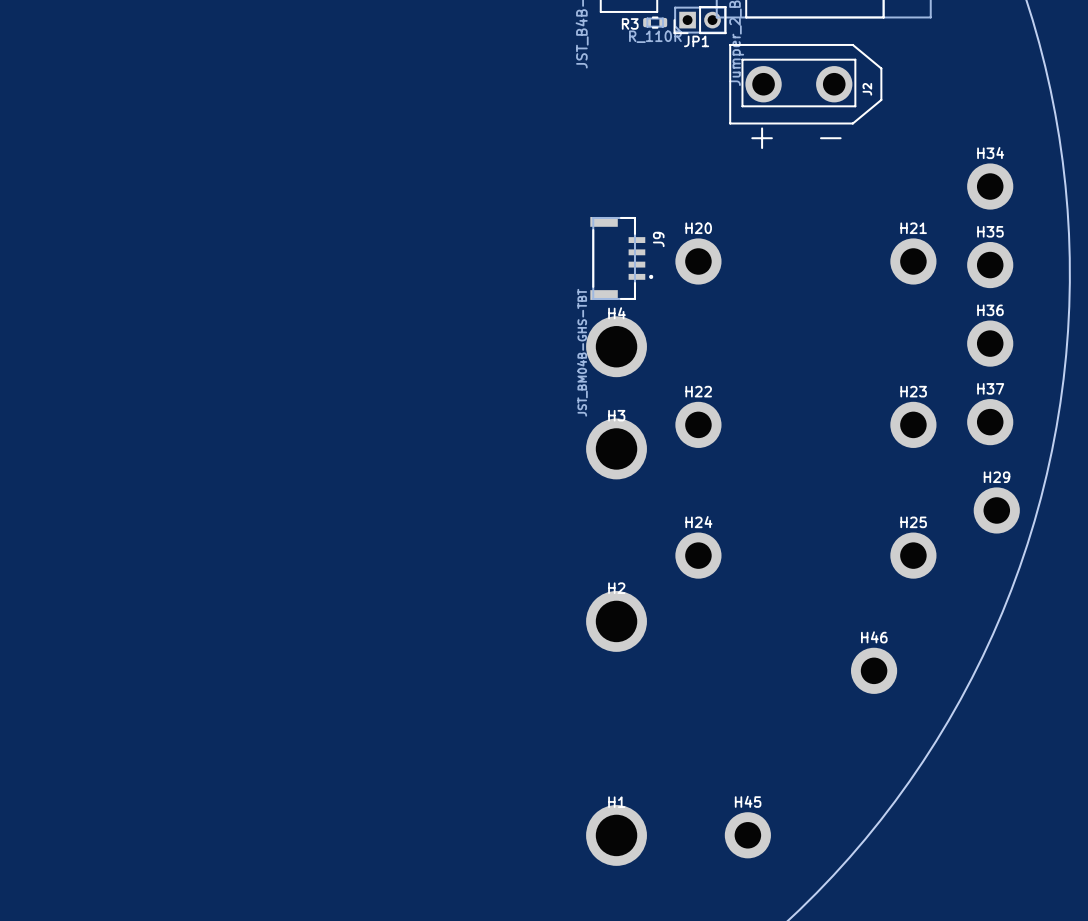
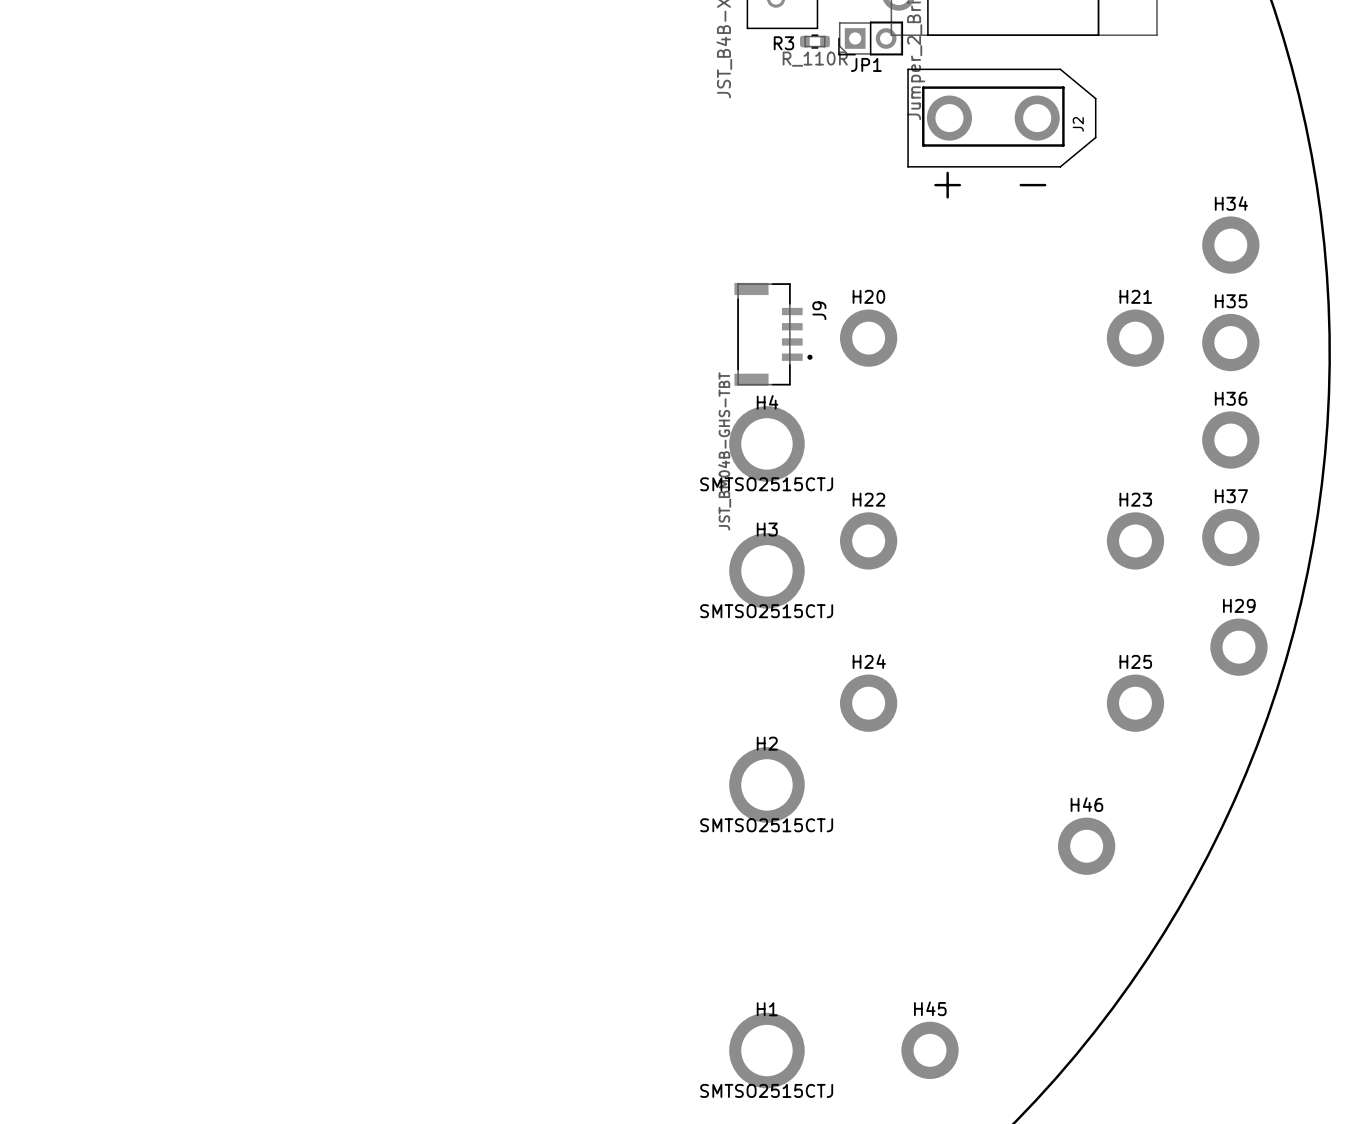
H4 value: none -> SMTSO2515CTJ (766, 484)
H3 value: none -> SMTSO2515CTJ (766, 611)
H2 value: none -> SMTSO2515CTJ (766, 825)
H1 value: none -> SMTSO2515CTJ (766, 1090)

